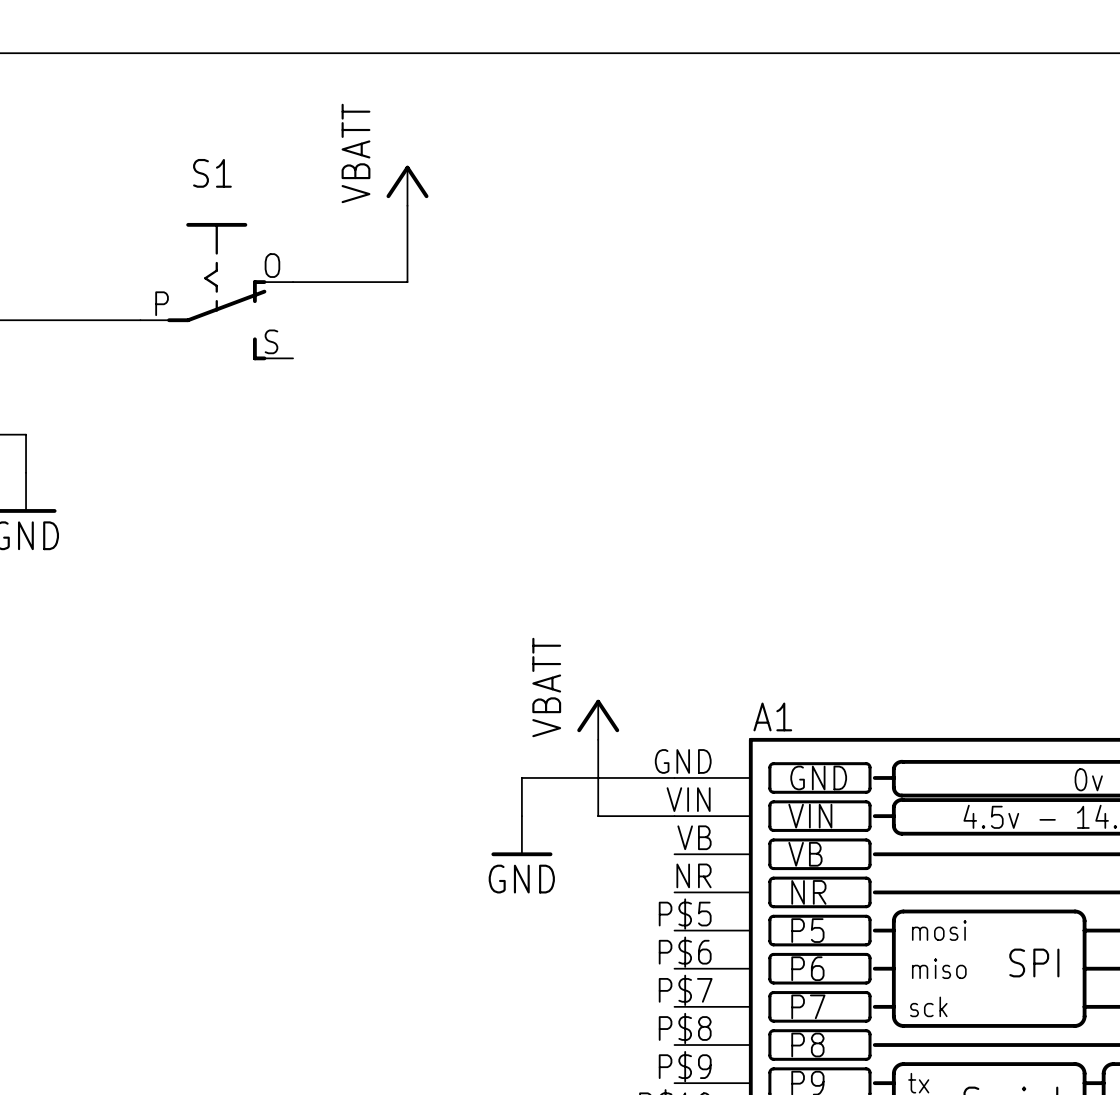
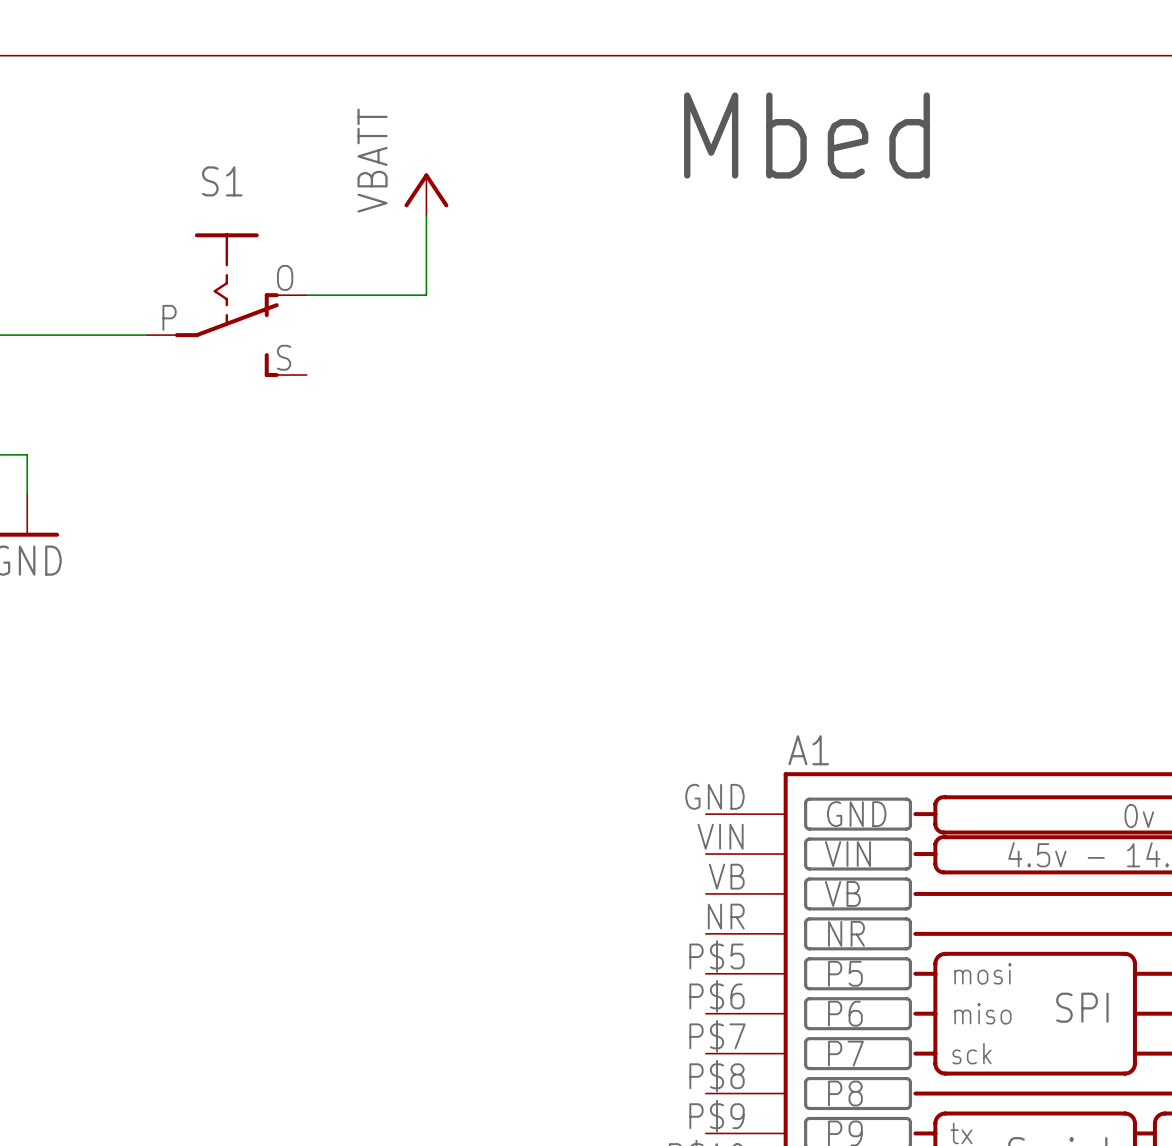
text: none -> Mbed (806, 135)
power symbol: VBATT (598, 719) -> none
wire: (598, 739) (598, 816) (674, 816) -> none
wire: (674, 777) (521, 777) (521, 816) -> none
power symbol: GND (521, 836) -> none

